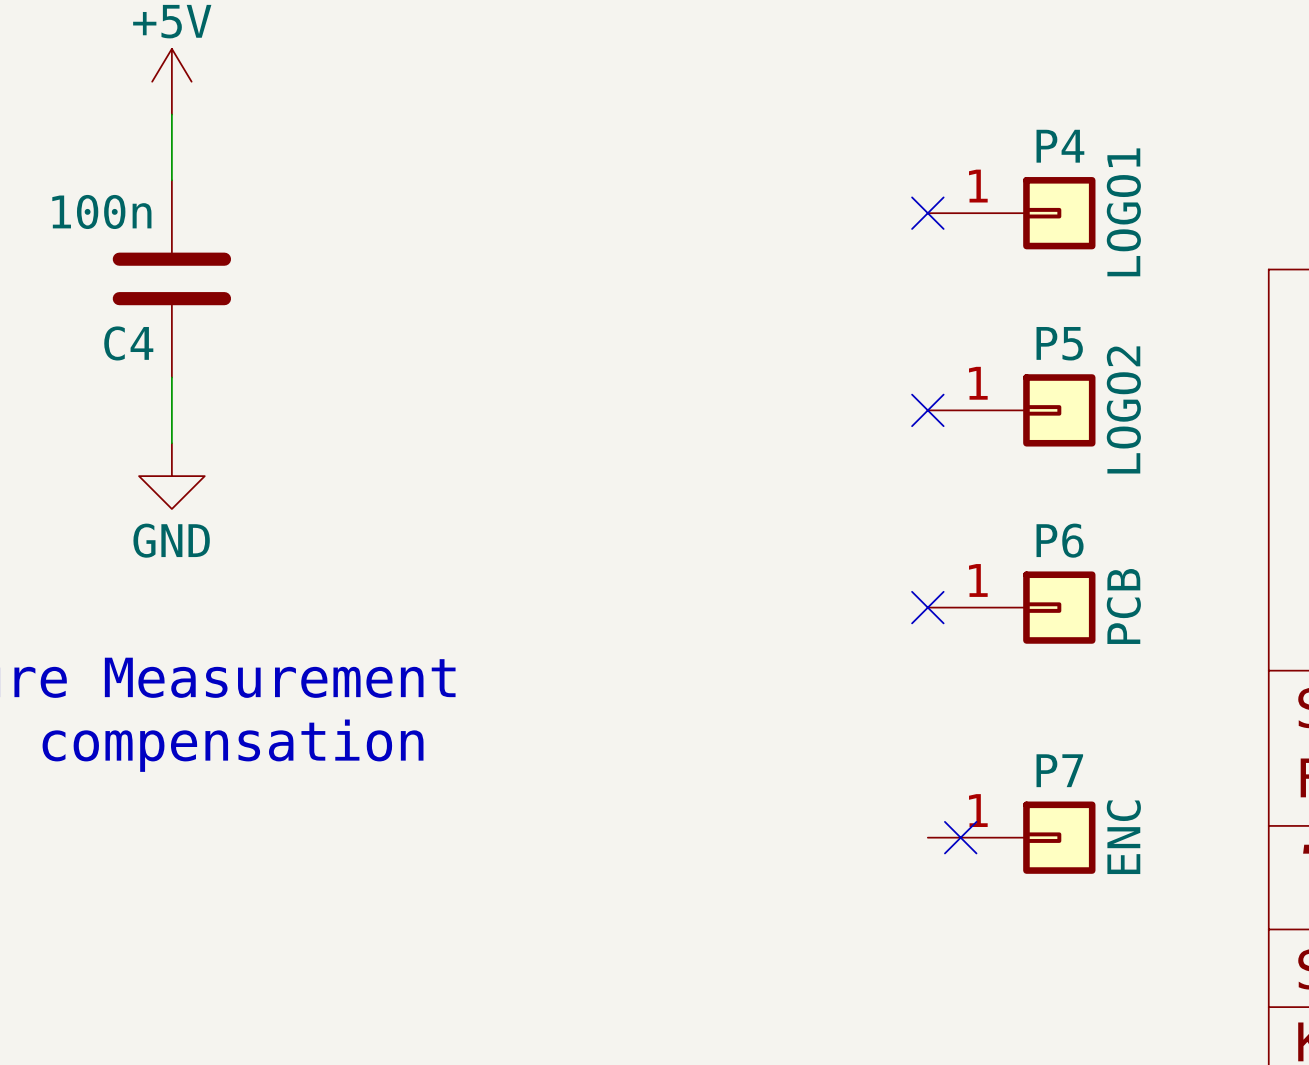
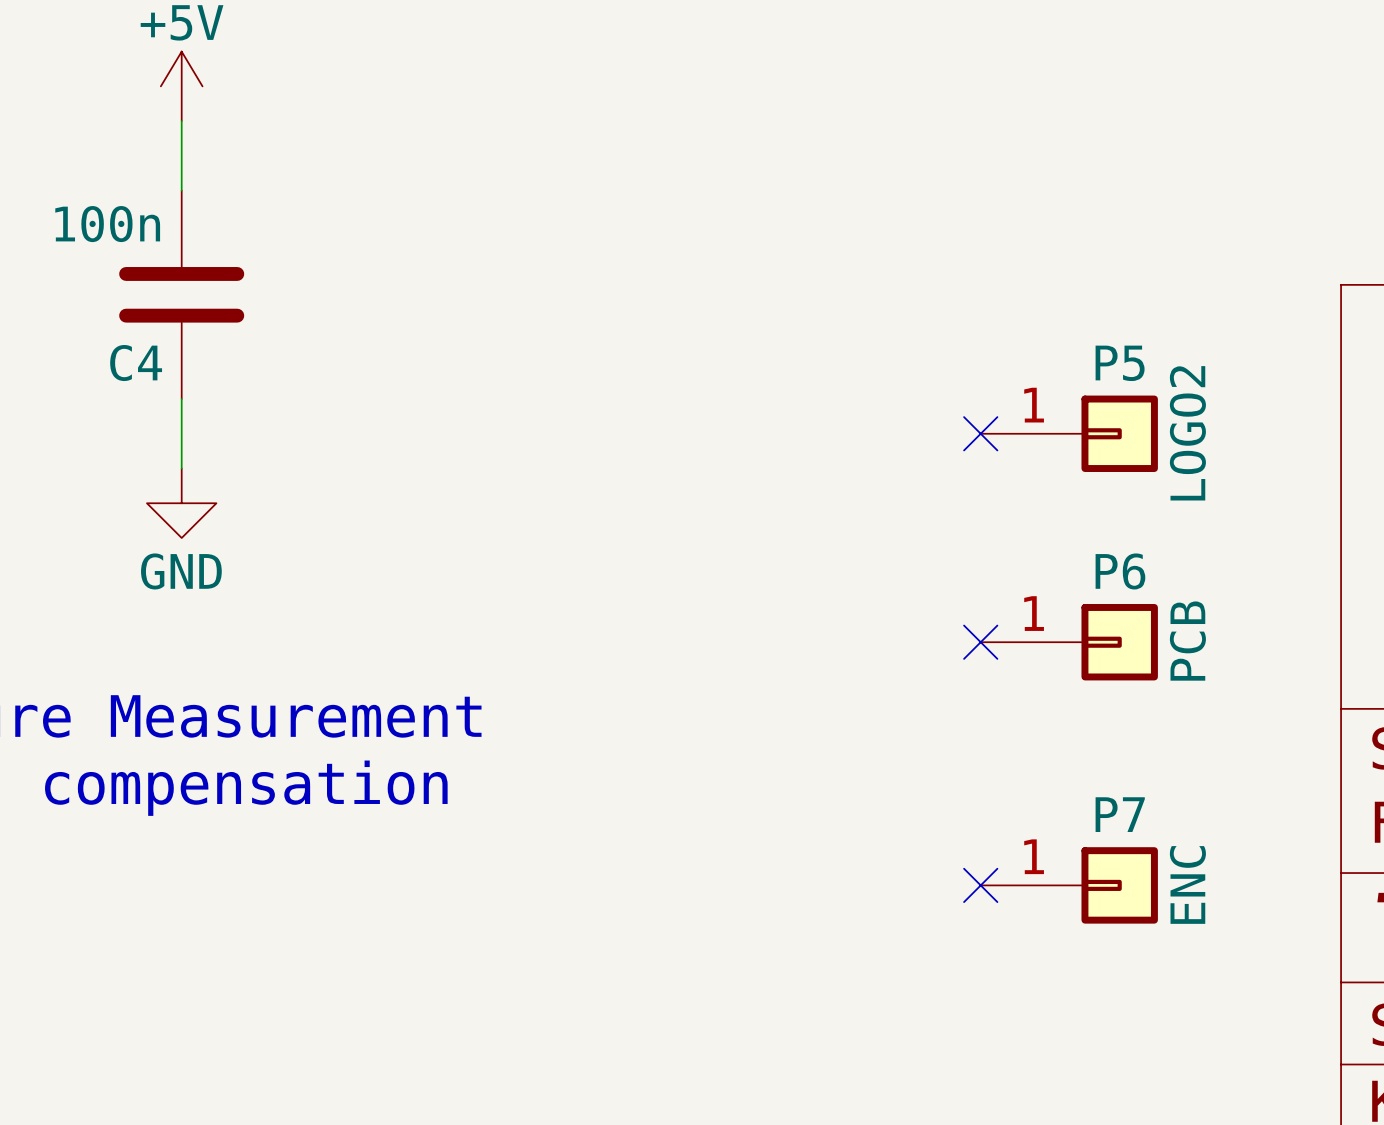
no-connect mark: (927, 213) -> none
P4: LOGO1 (1011, 213) -> none
no-connect mark position: (960, 837) -> (980, 885)

